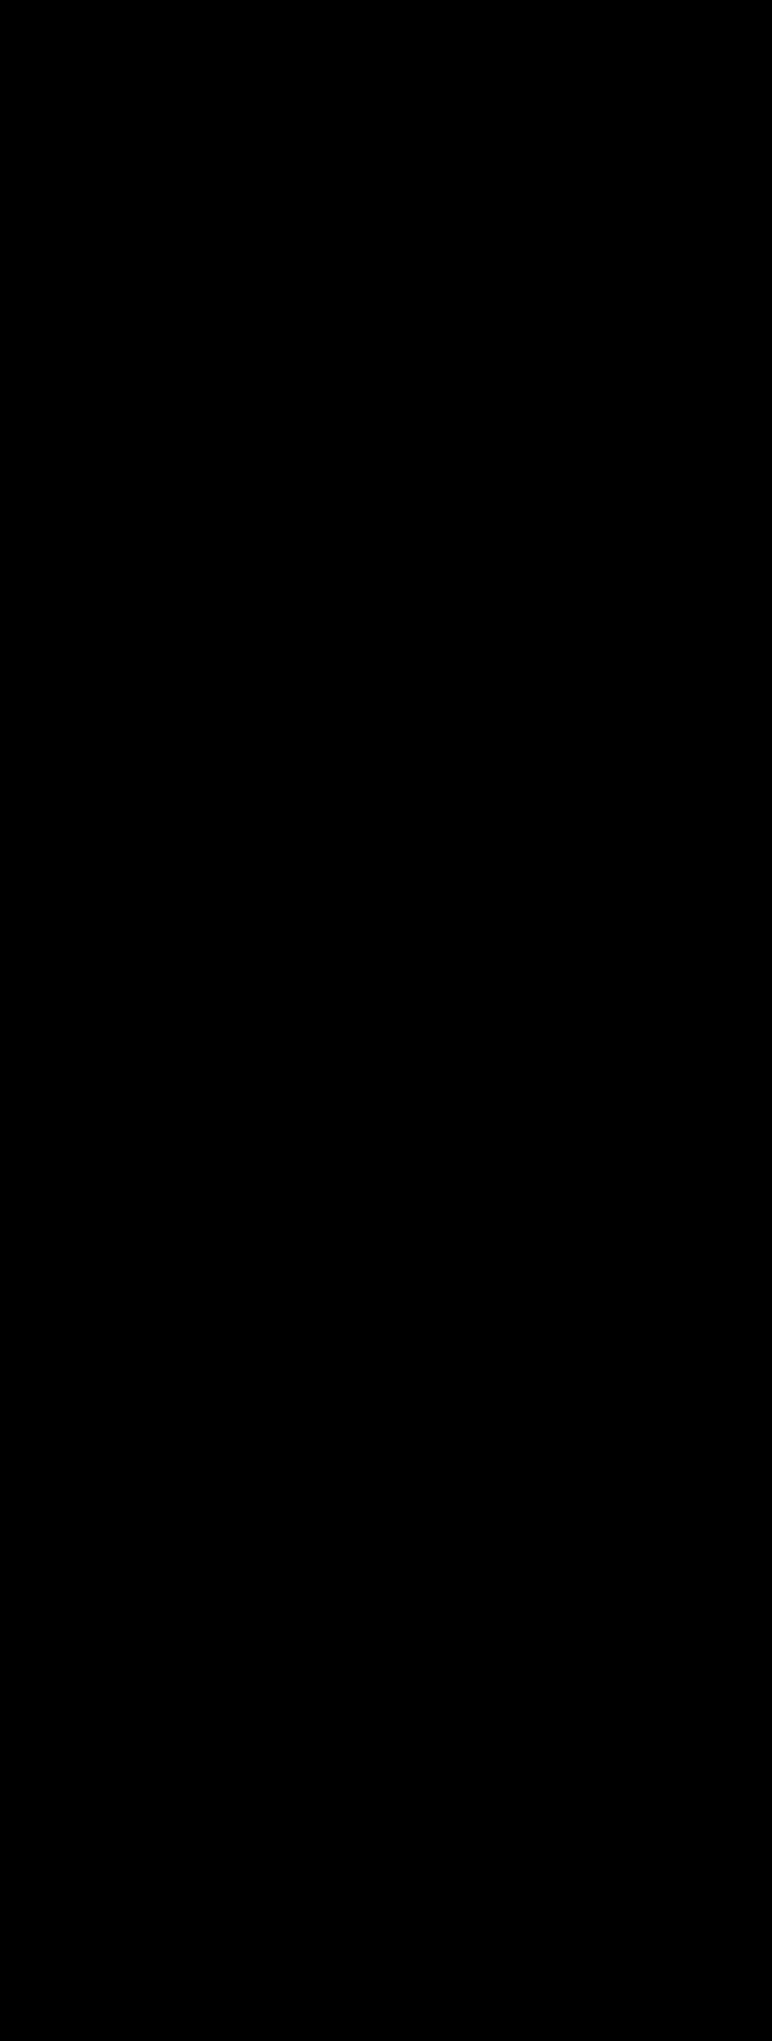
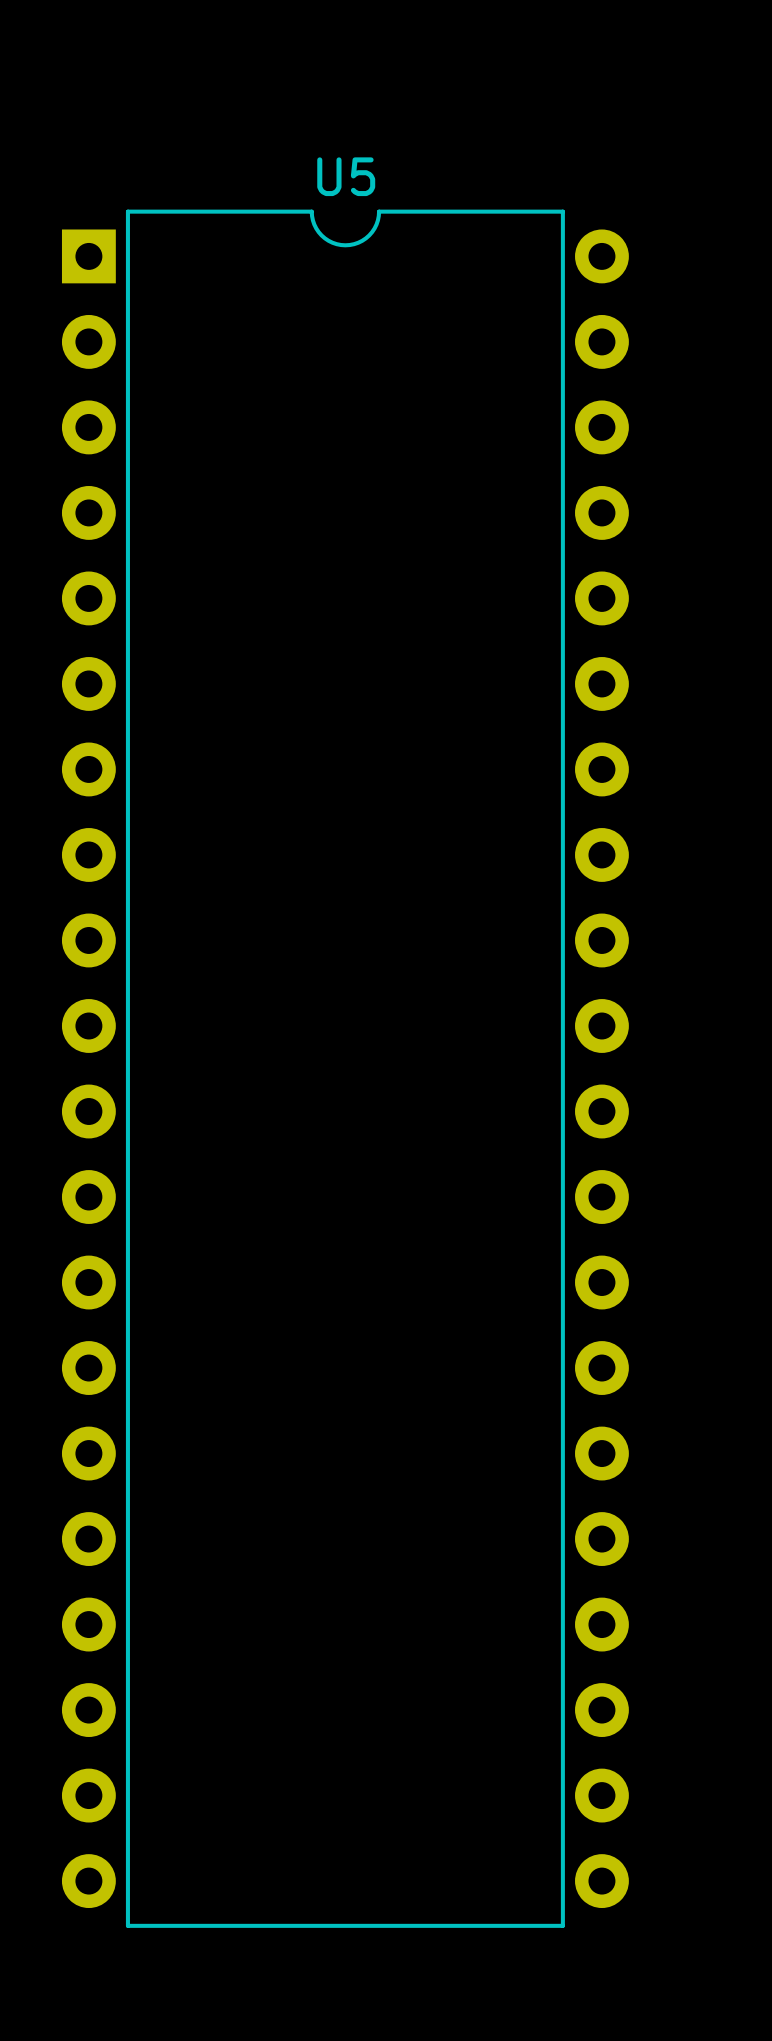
U5: none -> (345, 1068)

